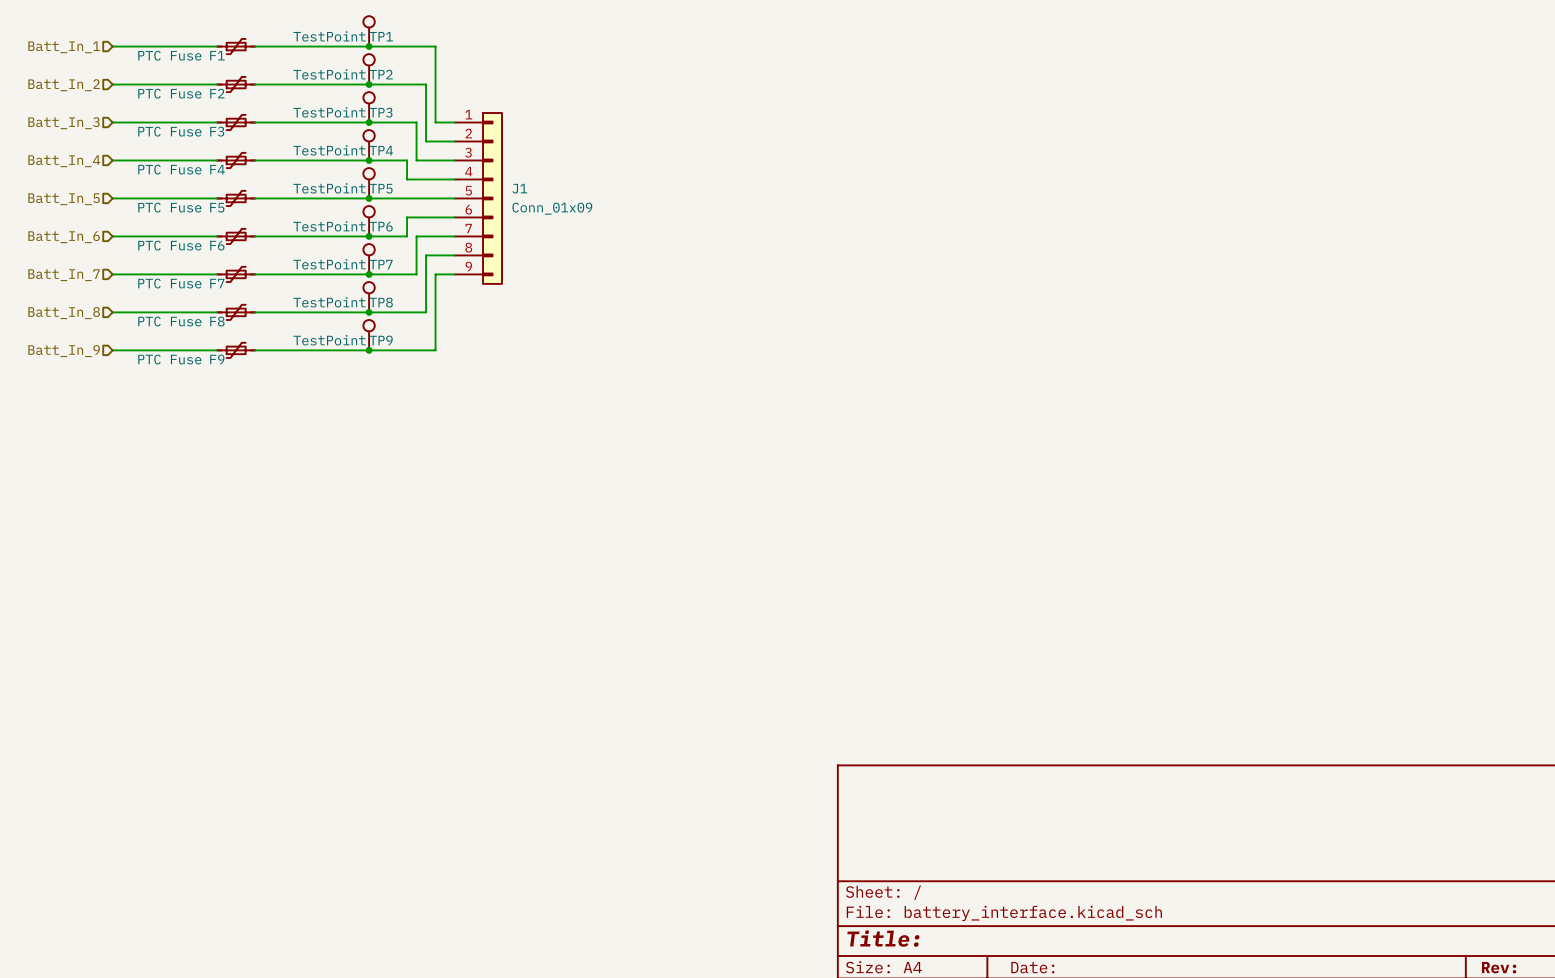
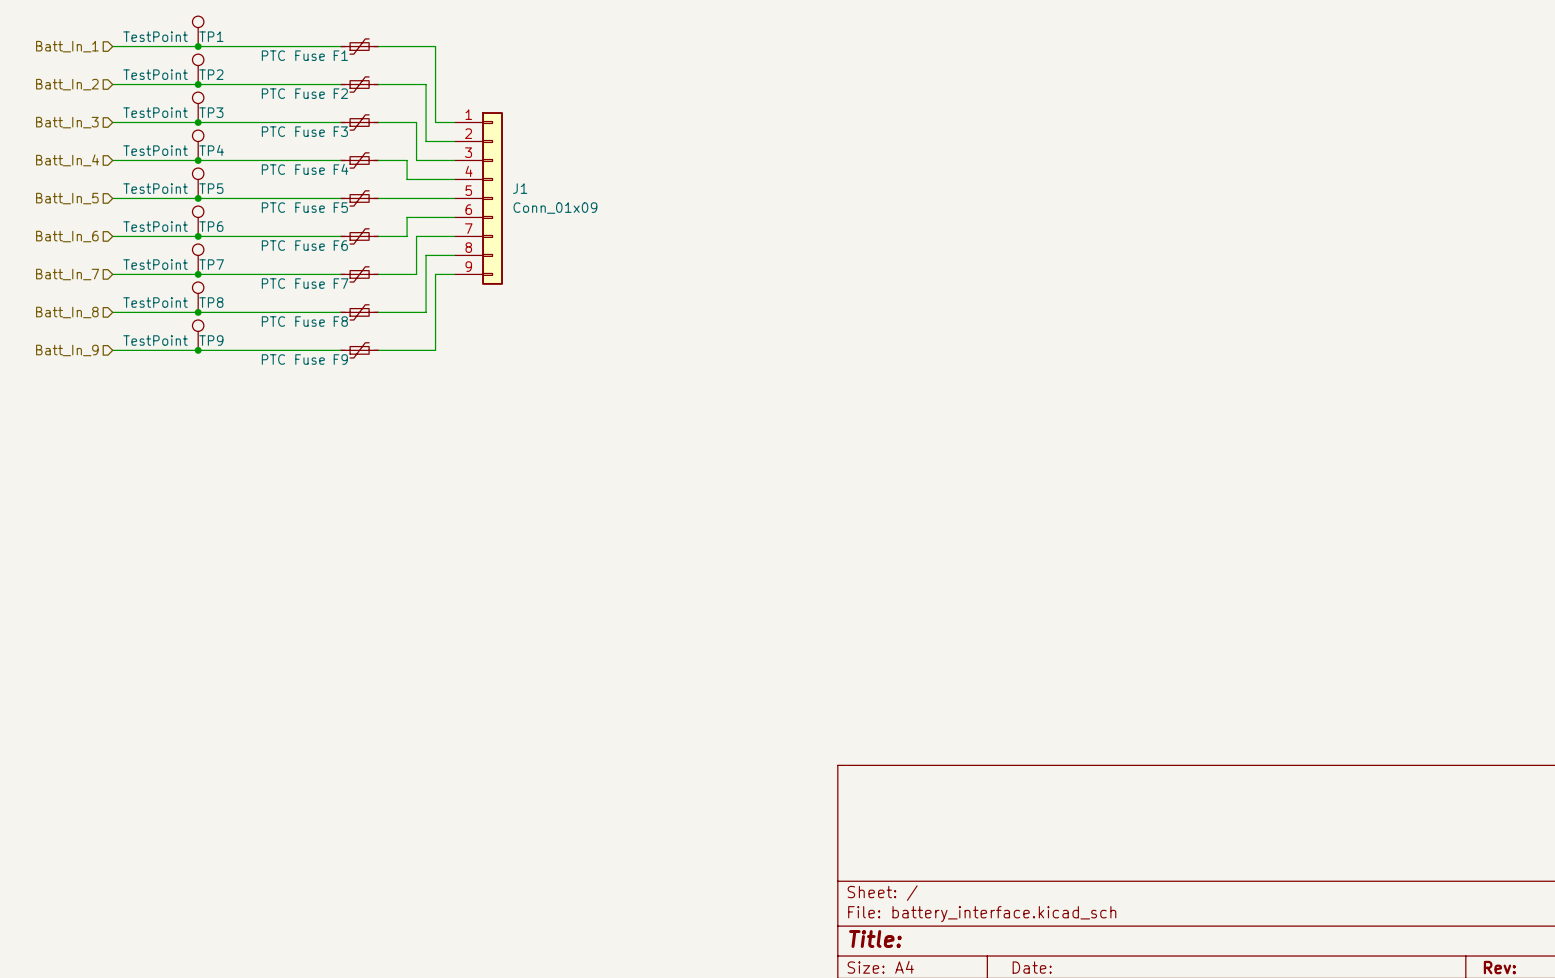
TP1 position: (369, 31) -> (198, 31)
junction: none -> (198, 46)
F1 position: (236, 46) -> (359, 46)
junction: (369, 46) -> none
TP2 position: (369, 69) -> (198, 69)
junction: none -> (198, 84)
F2 position: (236, 84) -> (359, 84)
junction: (369, 84) -> none
TP3 position: (369, 107) -> (198, 107)
junction: none -> (198, 122)
F3 position: (236, 122) -> (359, 122)
junction: (369, 122) -> none
TP4 position: (369, 145) -> (198, 145)
junction: none -> (198, 160)
F4 position: (236, 160) -> (359, 160)
junction: (369, 160) -> none
TP5 position: (369, 183) -> (198, 183)
junction: none -> (198, 198)
F5 position: (236, 198) -> (359, 198)
junction: (369, 198) -> none
TP6 position: (369, 221) -> (198, 221)
junction: none -> (198, 236)
F6 position: (236, 236) -> (359, 236)
junction: (369, 236) -> none
TP7 position: (369, 259) -> (198, 259)
junction: none -> (198, 274)
F7 position: (236, 274) -> (359, 274)
junction: (369, 274) -> none
TP8 position: (369, 297) -> (198, 297)
junction: none -> (198, 312)
F8 position: (236, 312) -> (359, 312)
junction: (369, 312) -> none
TP9 position: (369, 335) -> (198, 335)
junction: none -> (198, 350)
F9 position: (236, 350) -> (359, 350)
junction: (369, 350) -> none

